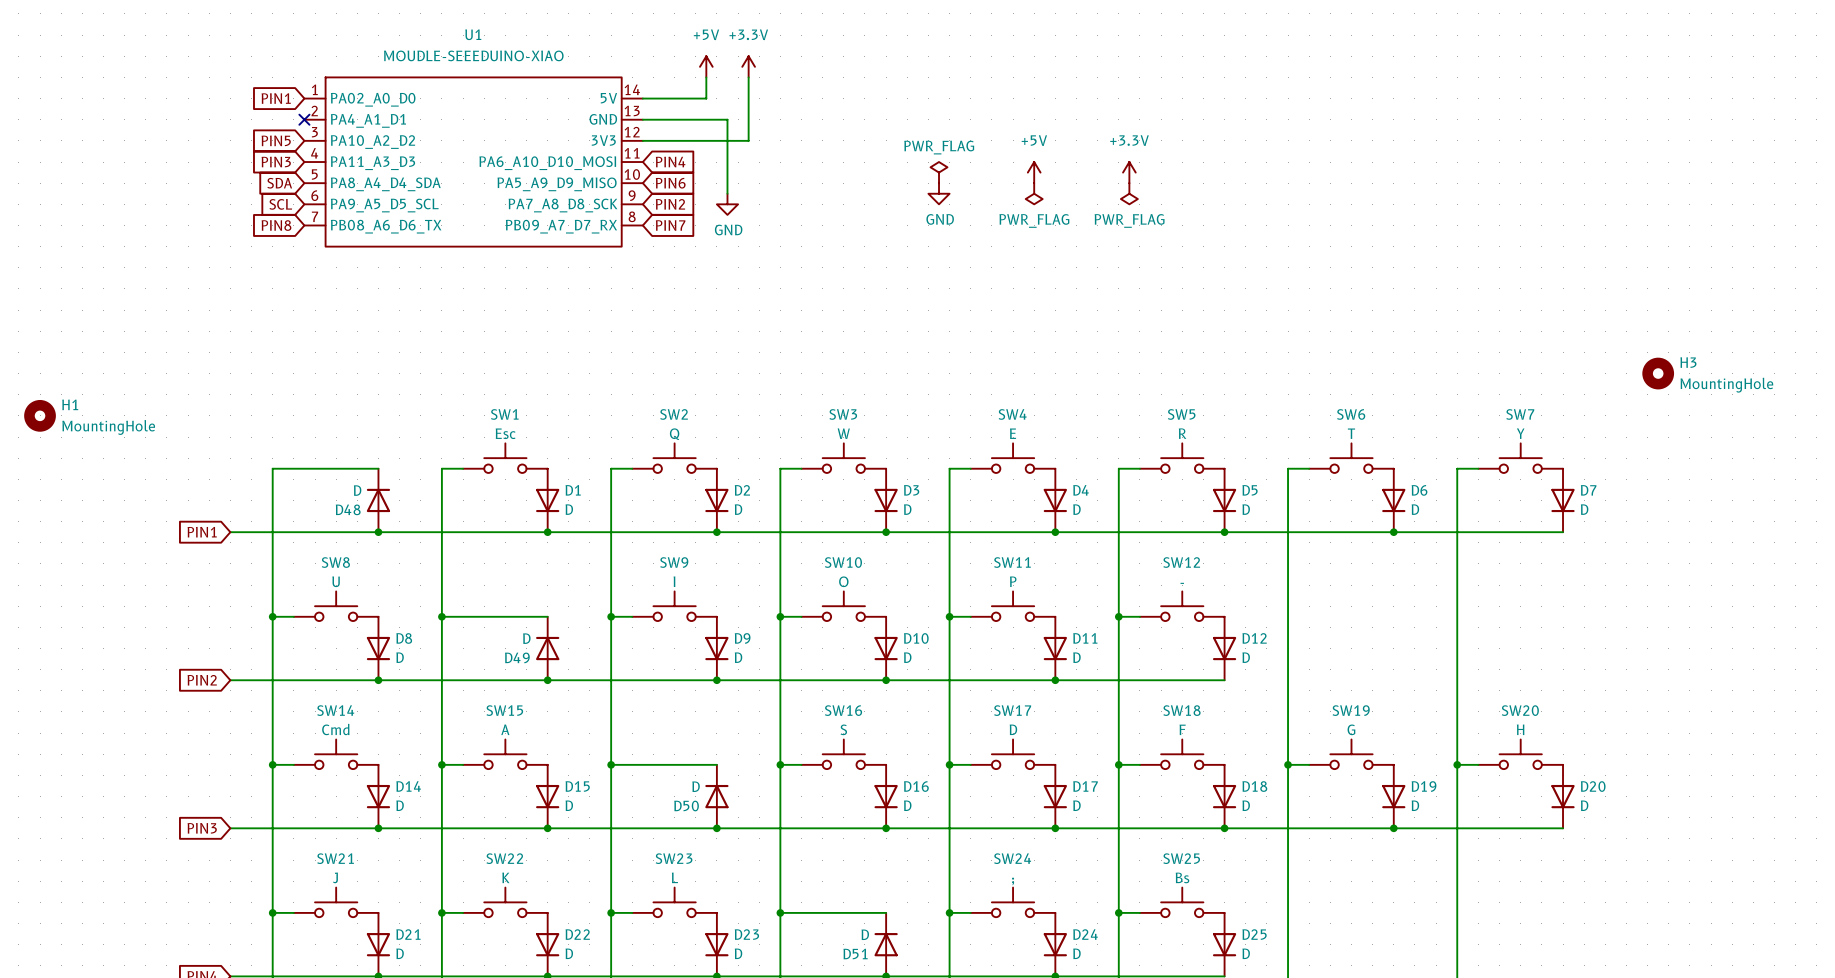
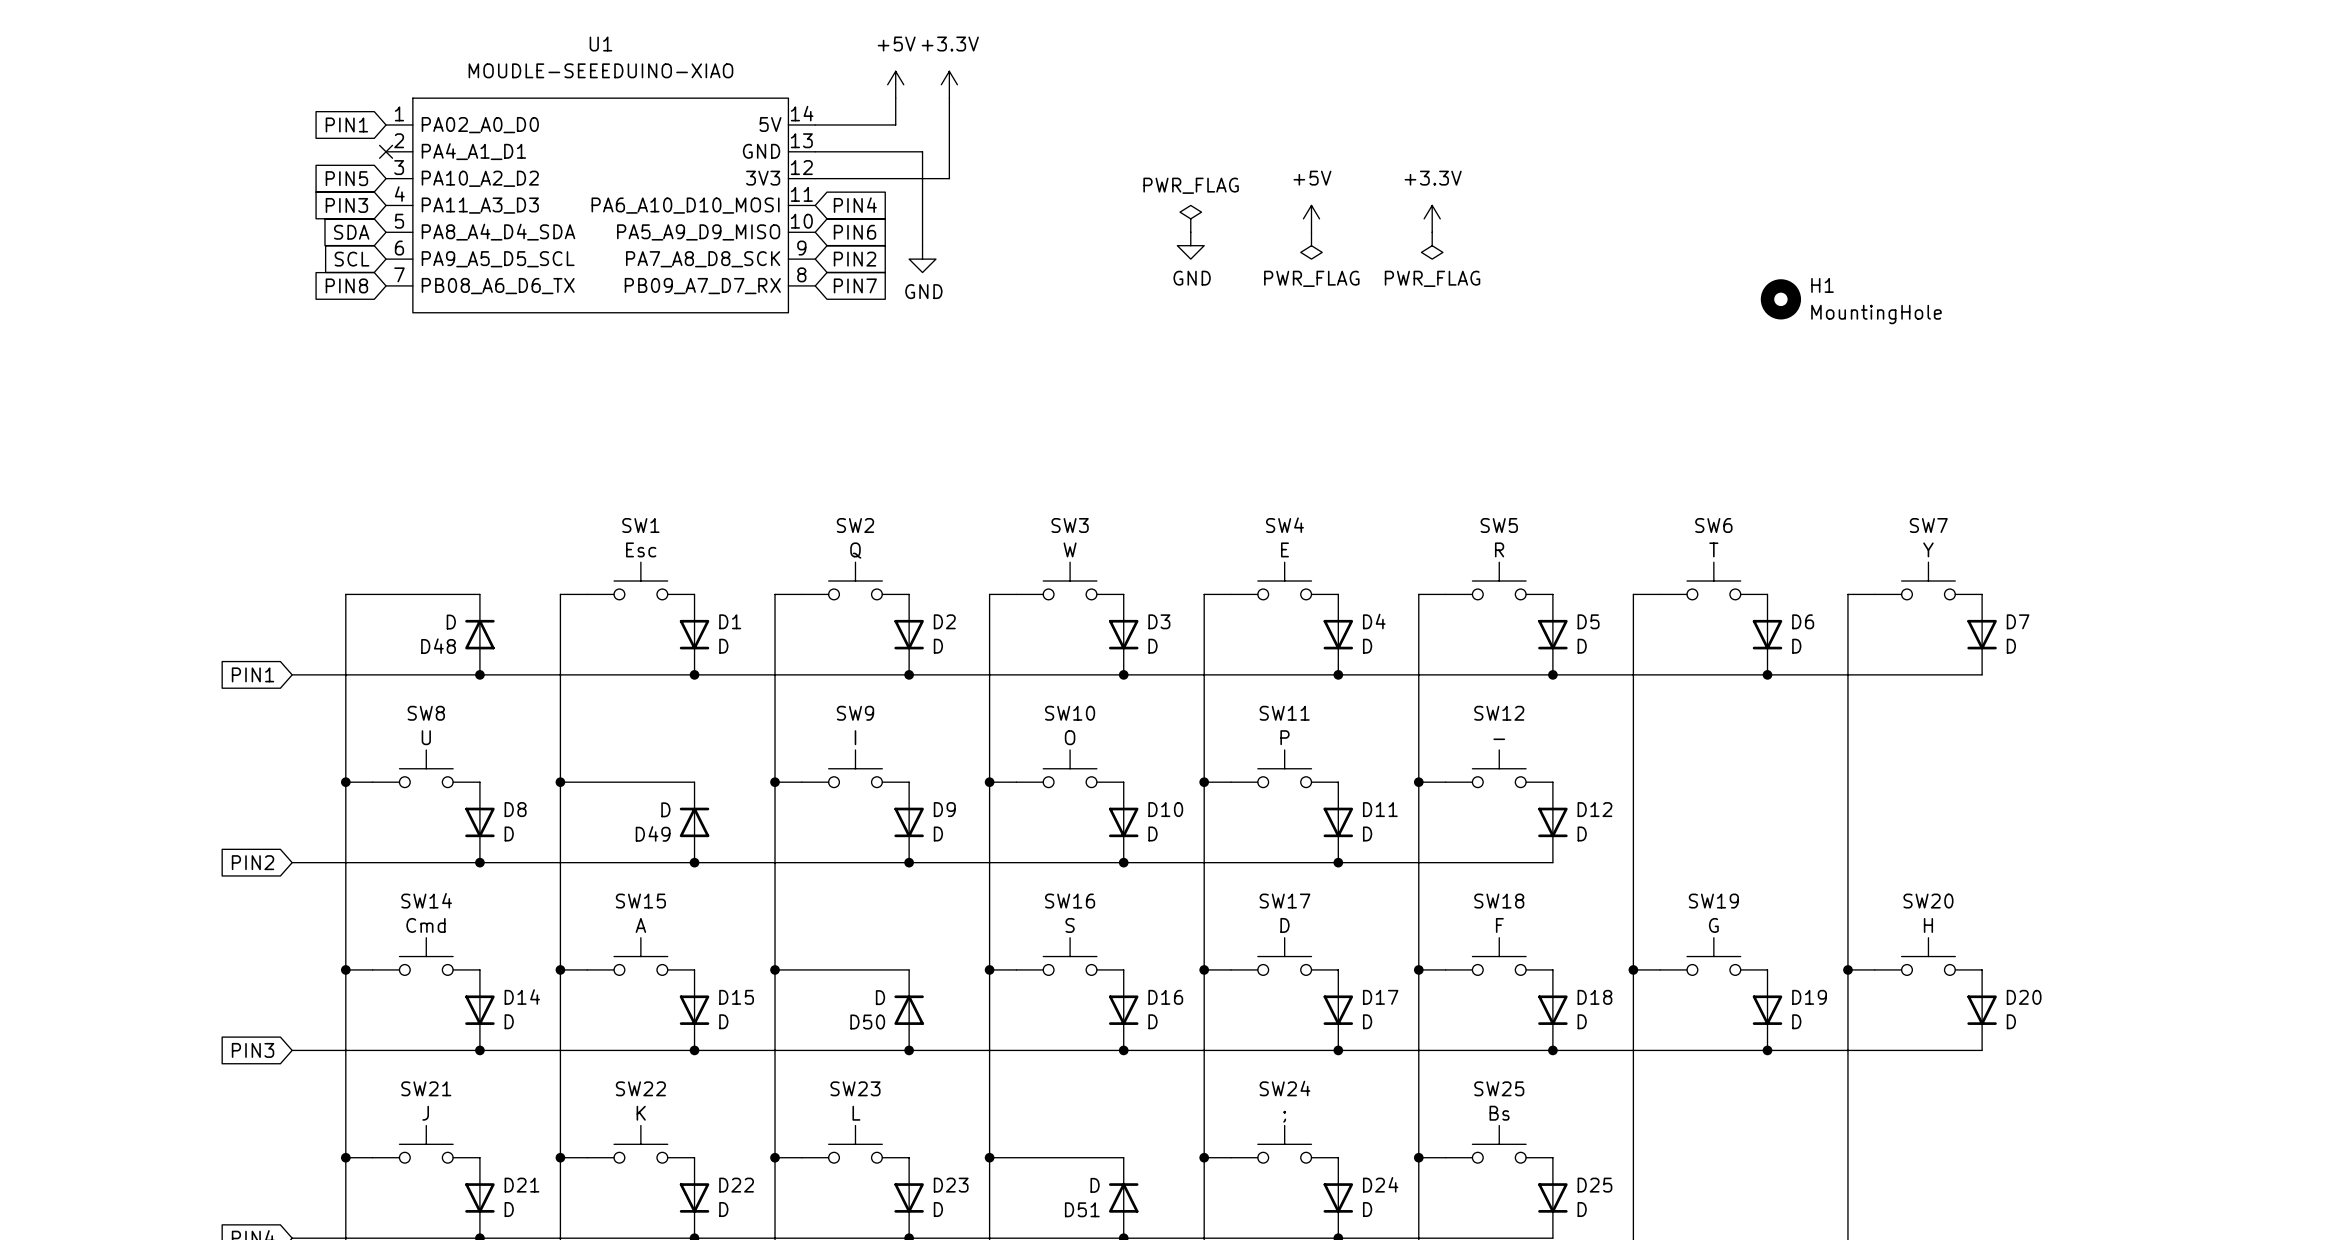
H3: MountingHole (1658, 373) -> none
H1 position: (40, 415) -> (1780, 299)

